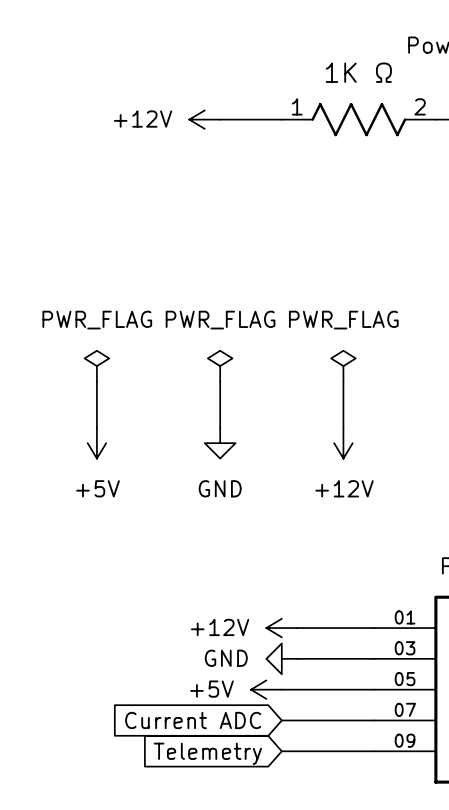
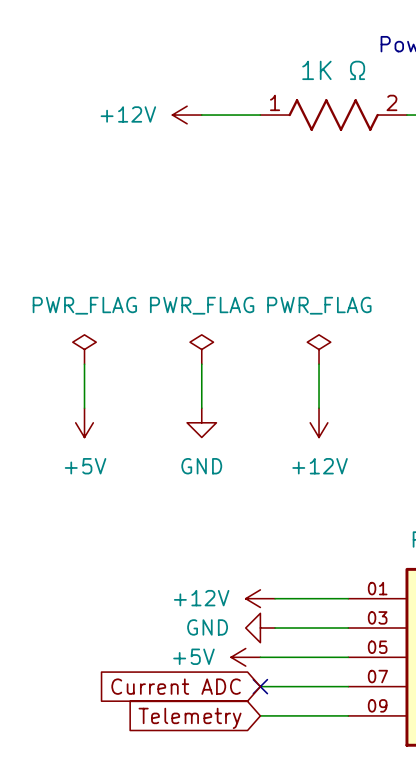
no-connect mark: none -> (260, 686)

